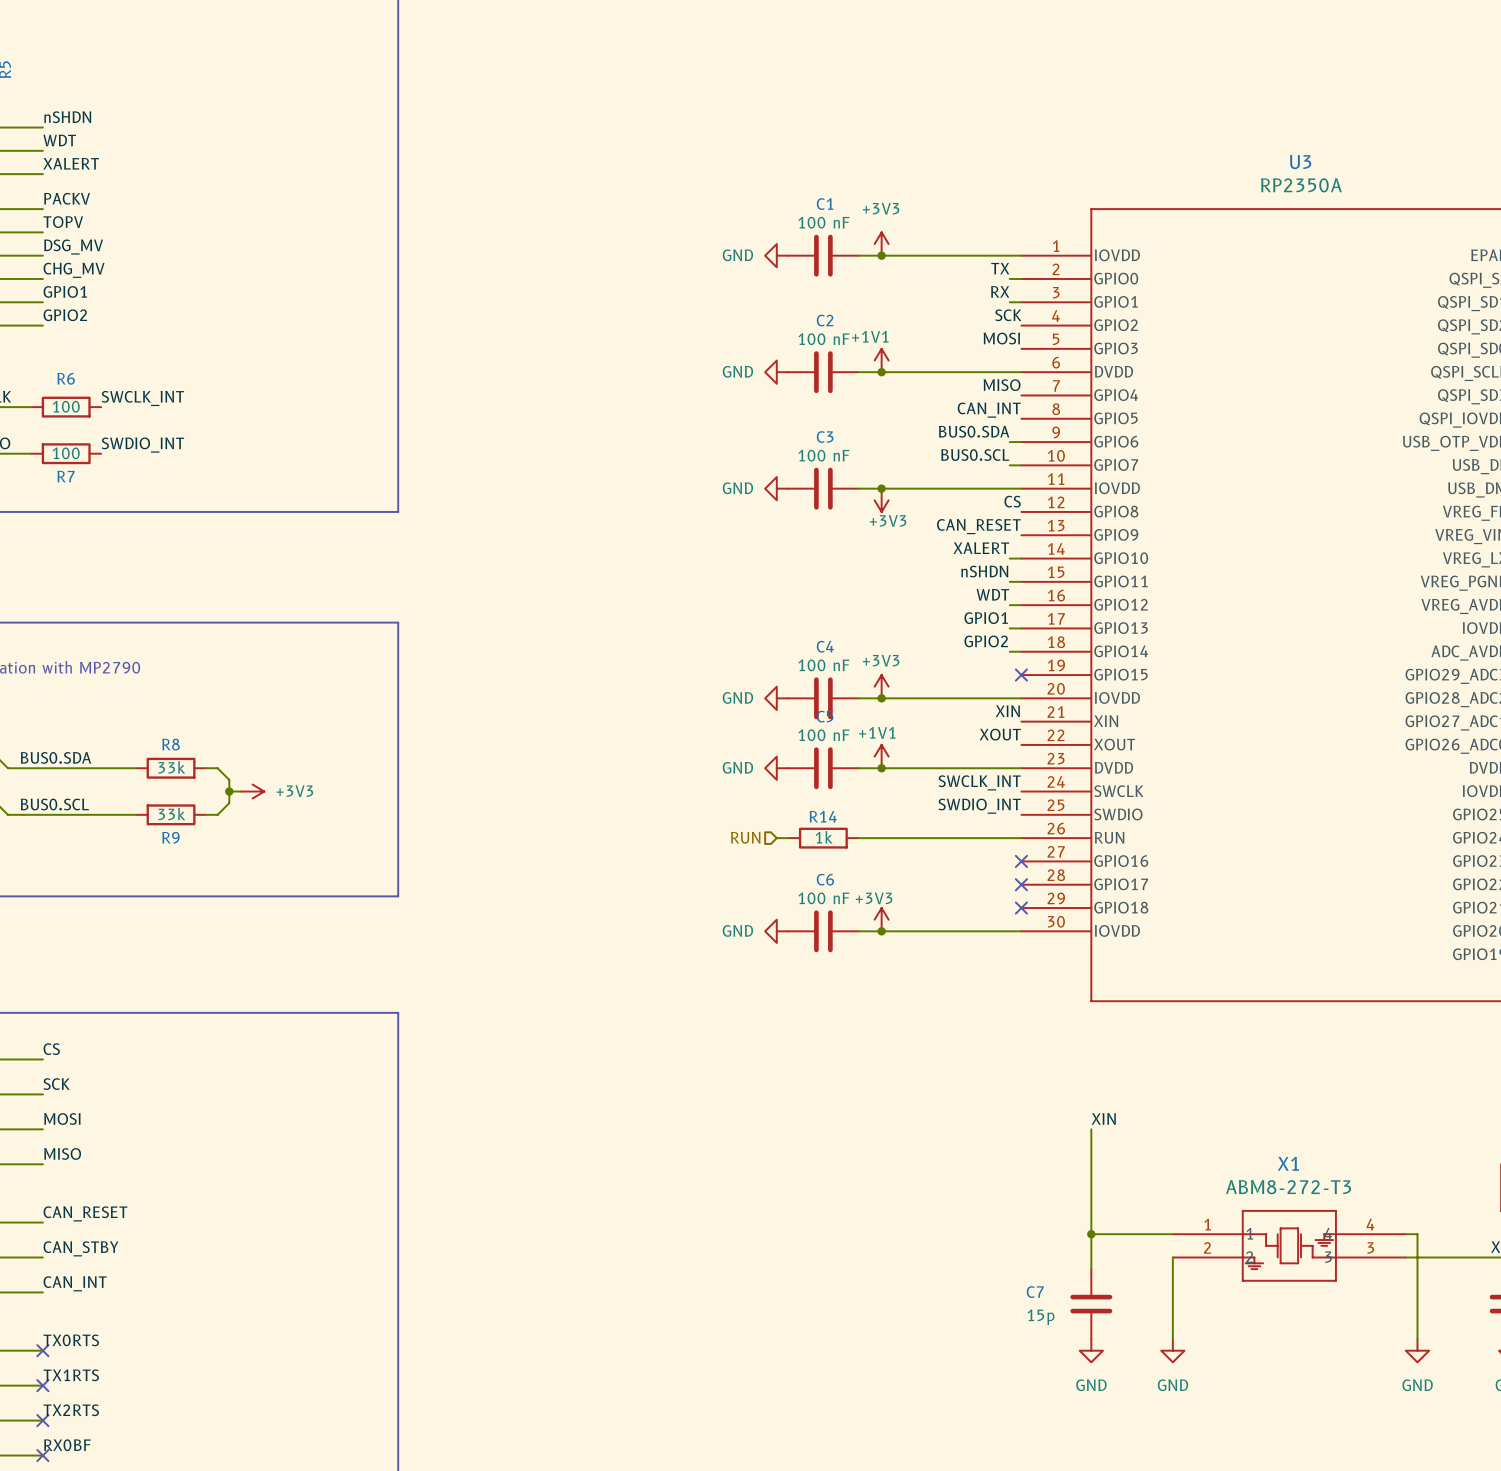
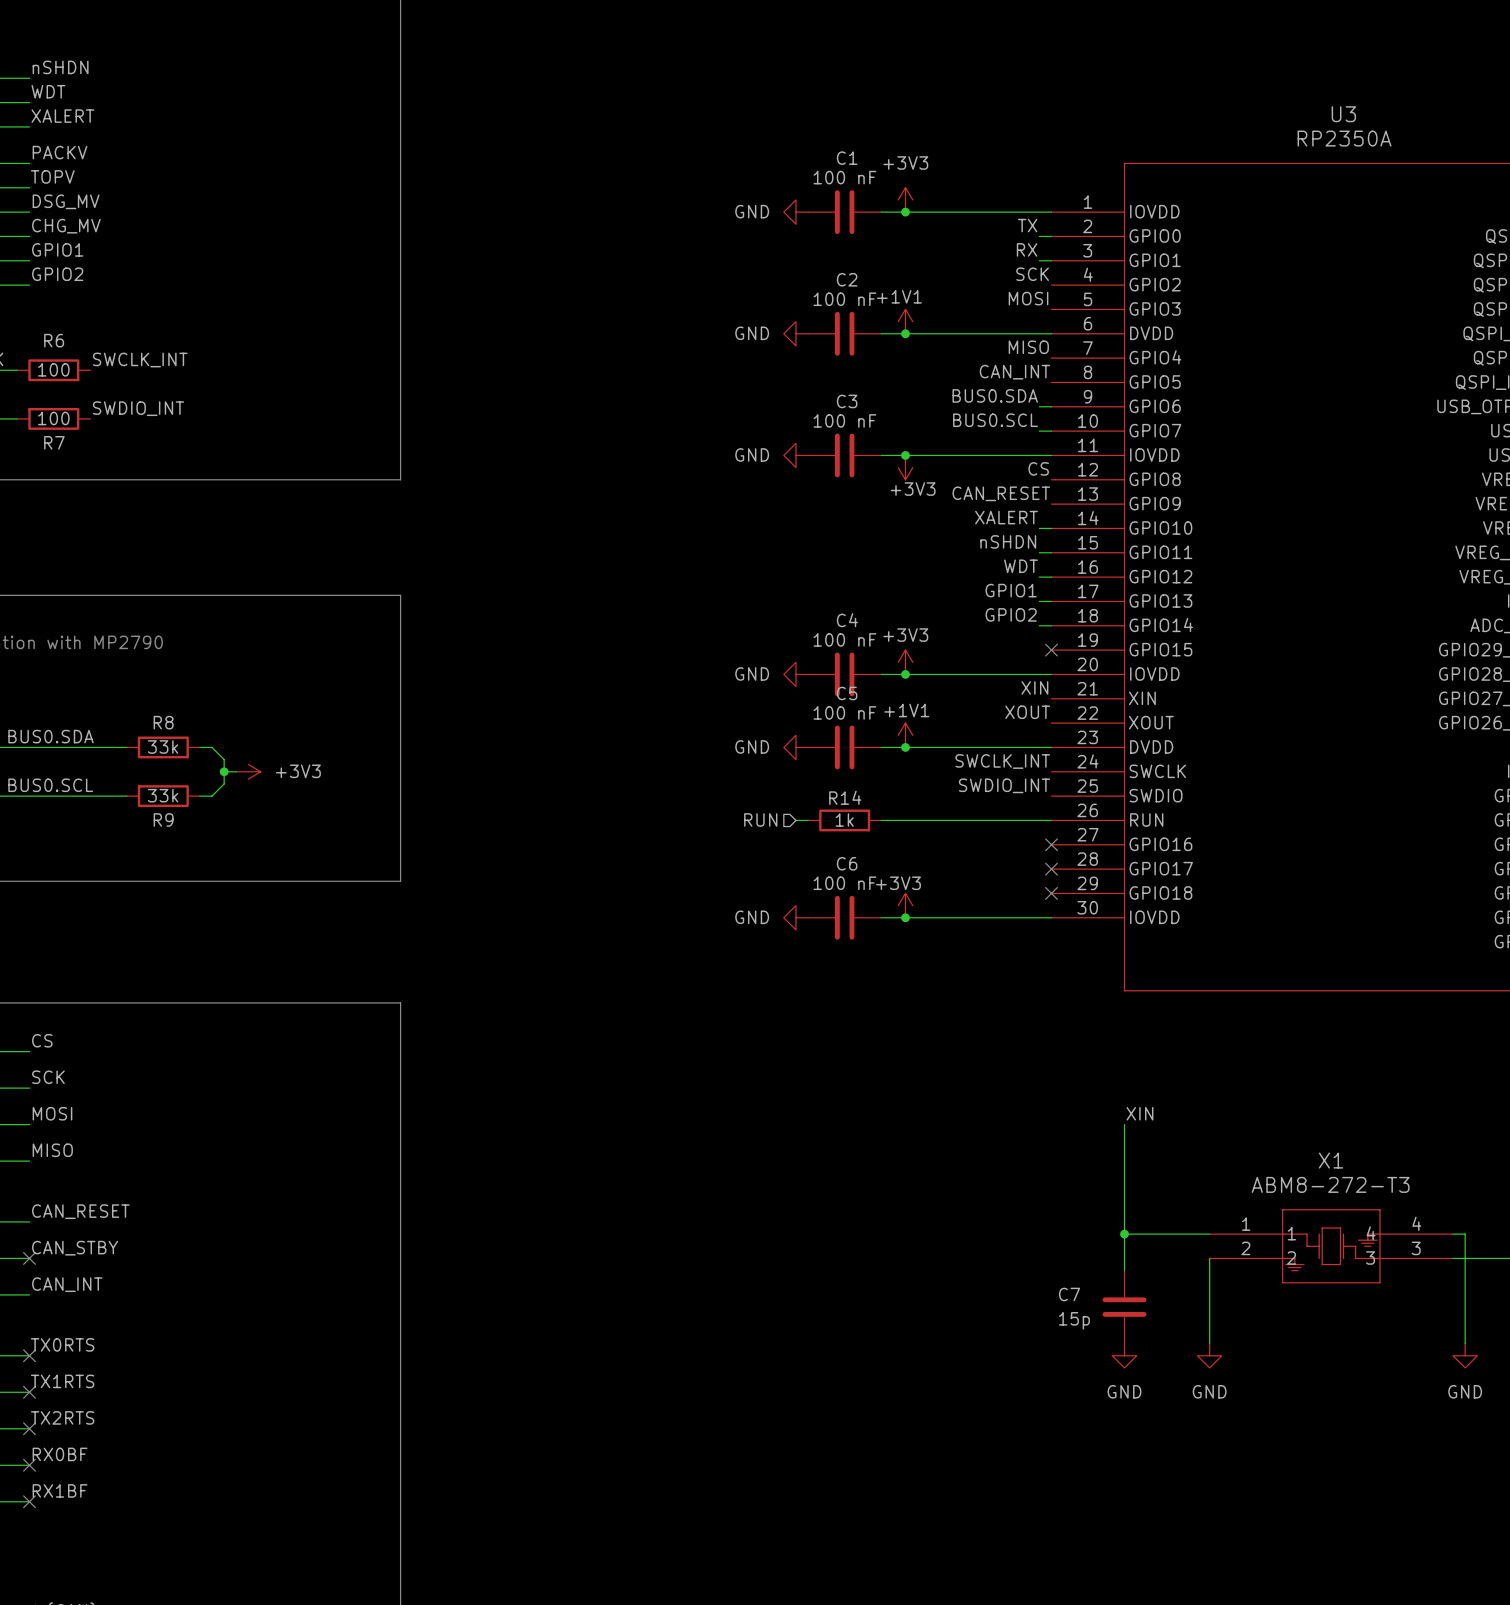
no-connect mark: none -> (29, 1258)

